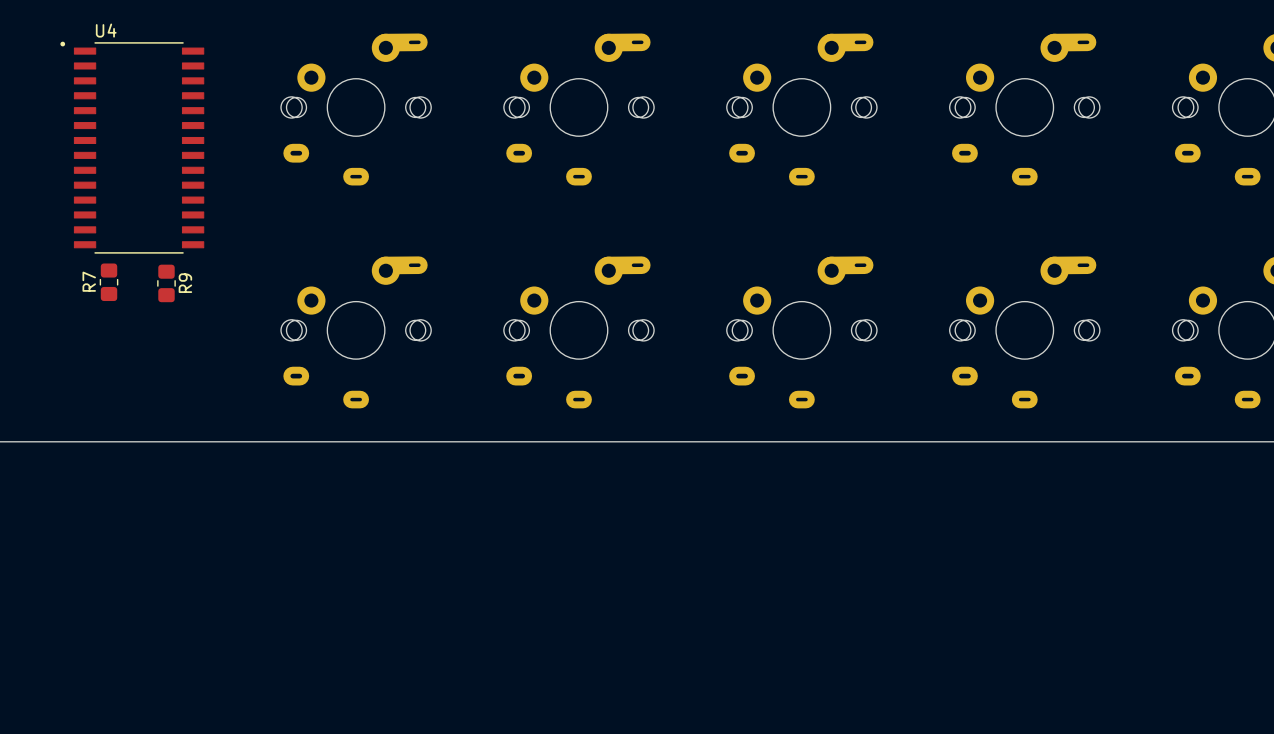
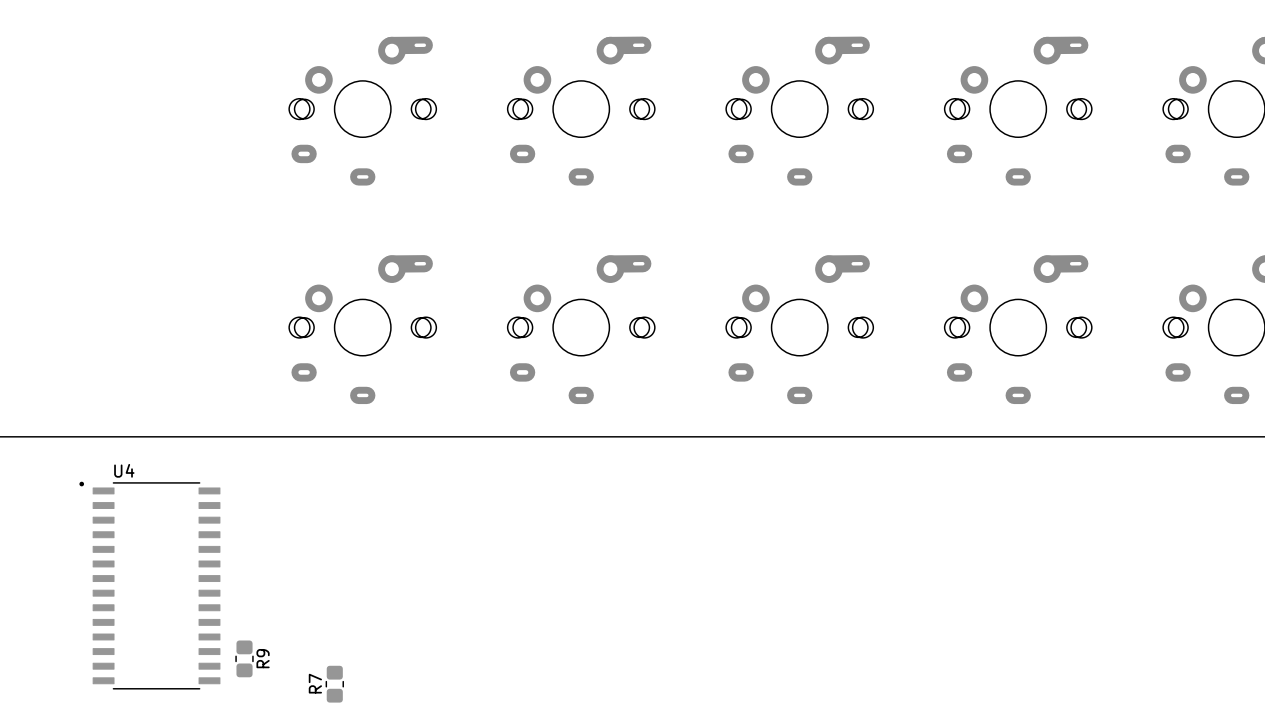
U4 position: (132, 147) -> (149, 585)
R7 position: (109, 282) -> (334, 684)
R9 position: (166, 283) -> (244, 658)

